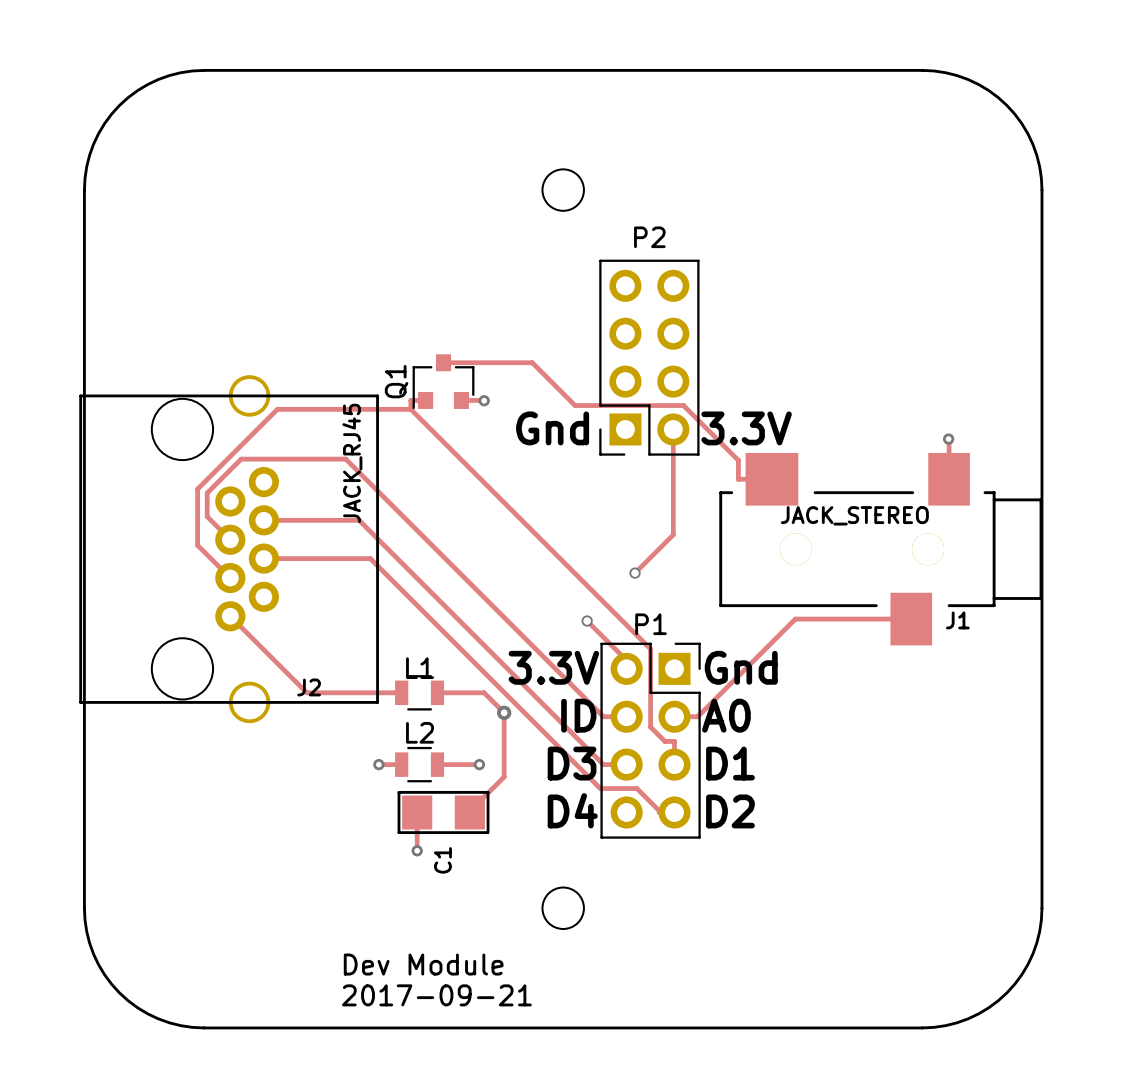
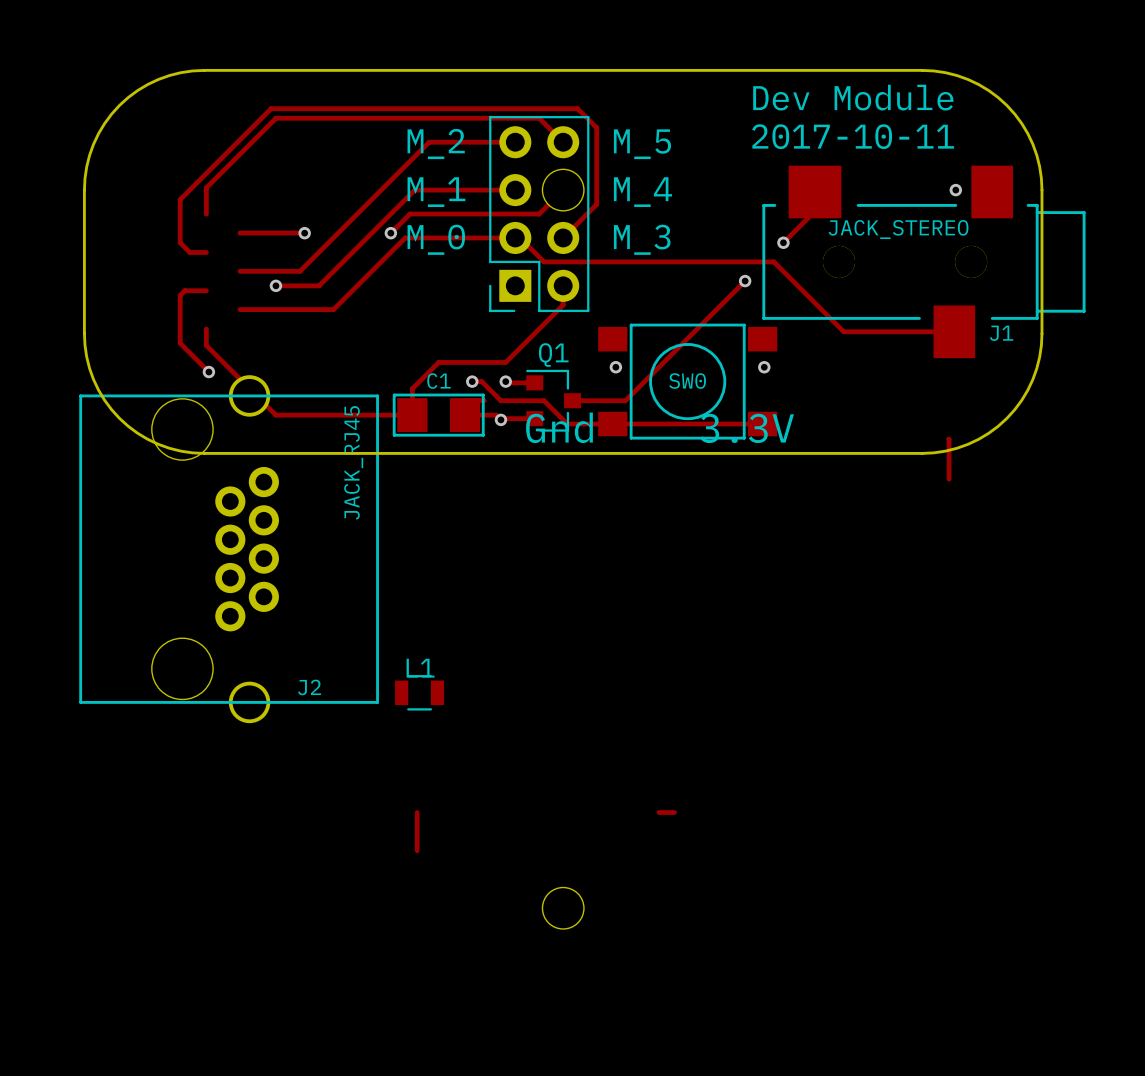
text: none -> Dev Module (853, 97)
text: none -> 2017-10-11 (853, 136)
text: none -> M_2 (436, 144)
track: none -> (515, 142) (429, 142) (300, 271) (239, 271)
track: none -> (563, 142) (539, 118) (275, 118) (206, 187) (206, 214)
text: none -> M_5 (642, 144)
text: none -> M_4 (642, 192)
text: none -> M_1 (436, 192)
track: none -> (515, 190) (414, 190) (319, 285) (275, 285)
track: none -> (563, 190) (539, 214) (410, 214) (390, 233)
via: none -> (955, 190)
track: none -> (815, 192) (815, 211) (783, 242)
part: none -> (539, 214)
track: none -> (239, 233) (304, 233)
via: none -> (304, 233)
via: none -> (390, 233)
track: none -> (563, 237) (596, 204) (596, 127) (577, 108) (271, 108) (180, 199) (180, 242) (189, 252) (206, 252)
text: none -> M_0 (436, 239)
text: none -> M_3 (642, 239)
via: none -> (783, 242)
track: none -> (745, 281) (625, 400) (572, 400)
via: none -> (745, 281)
via: none -> (275, 285)
track: none -> (563, 285) (563, 305) (505, 362) (438, 362) (412, 388) (412, 415) (275, 415) (206, 345) (206, 329)
track: none -> (206, 290) (184, 290) (180, 295) (180, 343) (208, 372)
track: none -> (239, 309) (333, 309) (405, 237) (520, 237) (544, 261) (773, 261) (843, 331) (954, 331)
board edge: (84, 333) (84, 908) (86, 931) (98, 964) (111, 984) (128, 1000) (158, 1018) (180, 1025) (204, 1027) (922, 1027) (957, 1022) (978, 1013) (998, 1000) (1014, 984) (1027, 964) (1036, 943) (1041, 919) (1041, 333) -> (84, 333) (86, 357) (93, 379) (104, 400) (119, 418) (137, 433) (158, 444) (180, 451) (204, 453) (934, 452) (957, 448) (978, 439) (1006, 418) (1021, 400) (1032, 379) (1039, 357) (1041, 333)
P2: (649, 357) -> none
track: (443, 362) (532, 362) (575, 405) (683, 405) (738, 460) (738, 479) (771, 479) -> none
via: none -> (615, 367)
via: none -> (764, 367)
via: none -> (208, 372)
Q1 rotation: 0° (443, 381) -> 90° clockwise (553, 400)
Q1 position: (443, 381) -> (553, 400)
track: none -> (472, 381) (481, 381) (500, 400) (544, 400) (567, 424) (762, 424)
via: none -> (472, 381)
track: none -> (505, 381) (534, 382)
via: none -> (505, 381)
SW0: none -> (687, 381)
track: (425, 400) (410, 400) (410, 409) -> none
via: (484, 400) -> none
track: (410, 409) (277, 409) (197, 489) (197, 545) (230, 578) -> none
track: (410, 409) (650, 649) (650, 727) (664, 741) (674, 741) (674, 764) -> none
track: none -> (465, 415) (496, 415) (500, 419) (534, 418)
via: none -> (500, 419)
track: (673, 429) (673, 534) (635, 573) -> none
via: (948, 439) -> none
track: (263, 520) (359, 520) (603, 764) (626, 764) -> none
track: (230, 539) (207, 516) (207, 493) (241, 459) (345, 459) (603, 716) (626, 716) -> none
J1 position: (880, 549) -> (923, 261)
track: (263, 558) (370, 558) (600, 788) (636, 788) (660, 812) -> none
via: (635, 573) -> none
track: (230, 616) (306, 692) (401, 692) -> none
track: (911, 619) (795, 619) (697, 716) (674, 716) -> none
track: (587, 620) (626, 660) (626, 668) -> none
via: (587, 620) -> none
text: 3.3V (553, 667) -> none
text: Gnd (741, 667) -> none
track: (437, 692) (484, 692) (504, 712) (504, 776) (469, 811) -> none
via: (504, 712) -> none
text: ID (578, 715) -> none
text: A0 (726, 715) -> none
P1: (650, 740) -> none
text: D3 (572, 763) -> none
text: D1 (730, 763) -> none
track: (378, 764) (401, 764) -> none
via: (378, 764) -> none
L2: (419, 764) -> none
track: (437, 764) (479, 764) -> none
via: (479, 764) -> none
text: D4 (572, 810) -> none
text: D2 (730, 811) -> none
C1 rotation: 0° (443, 812) -> 180° (438, 415)
C1 position: (443, 812) -> (438, 415)
via: (417, 850) -> none
text: Dev Module (423, 964) -> none
text: 2017-09-21 (436, 995) -> none

